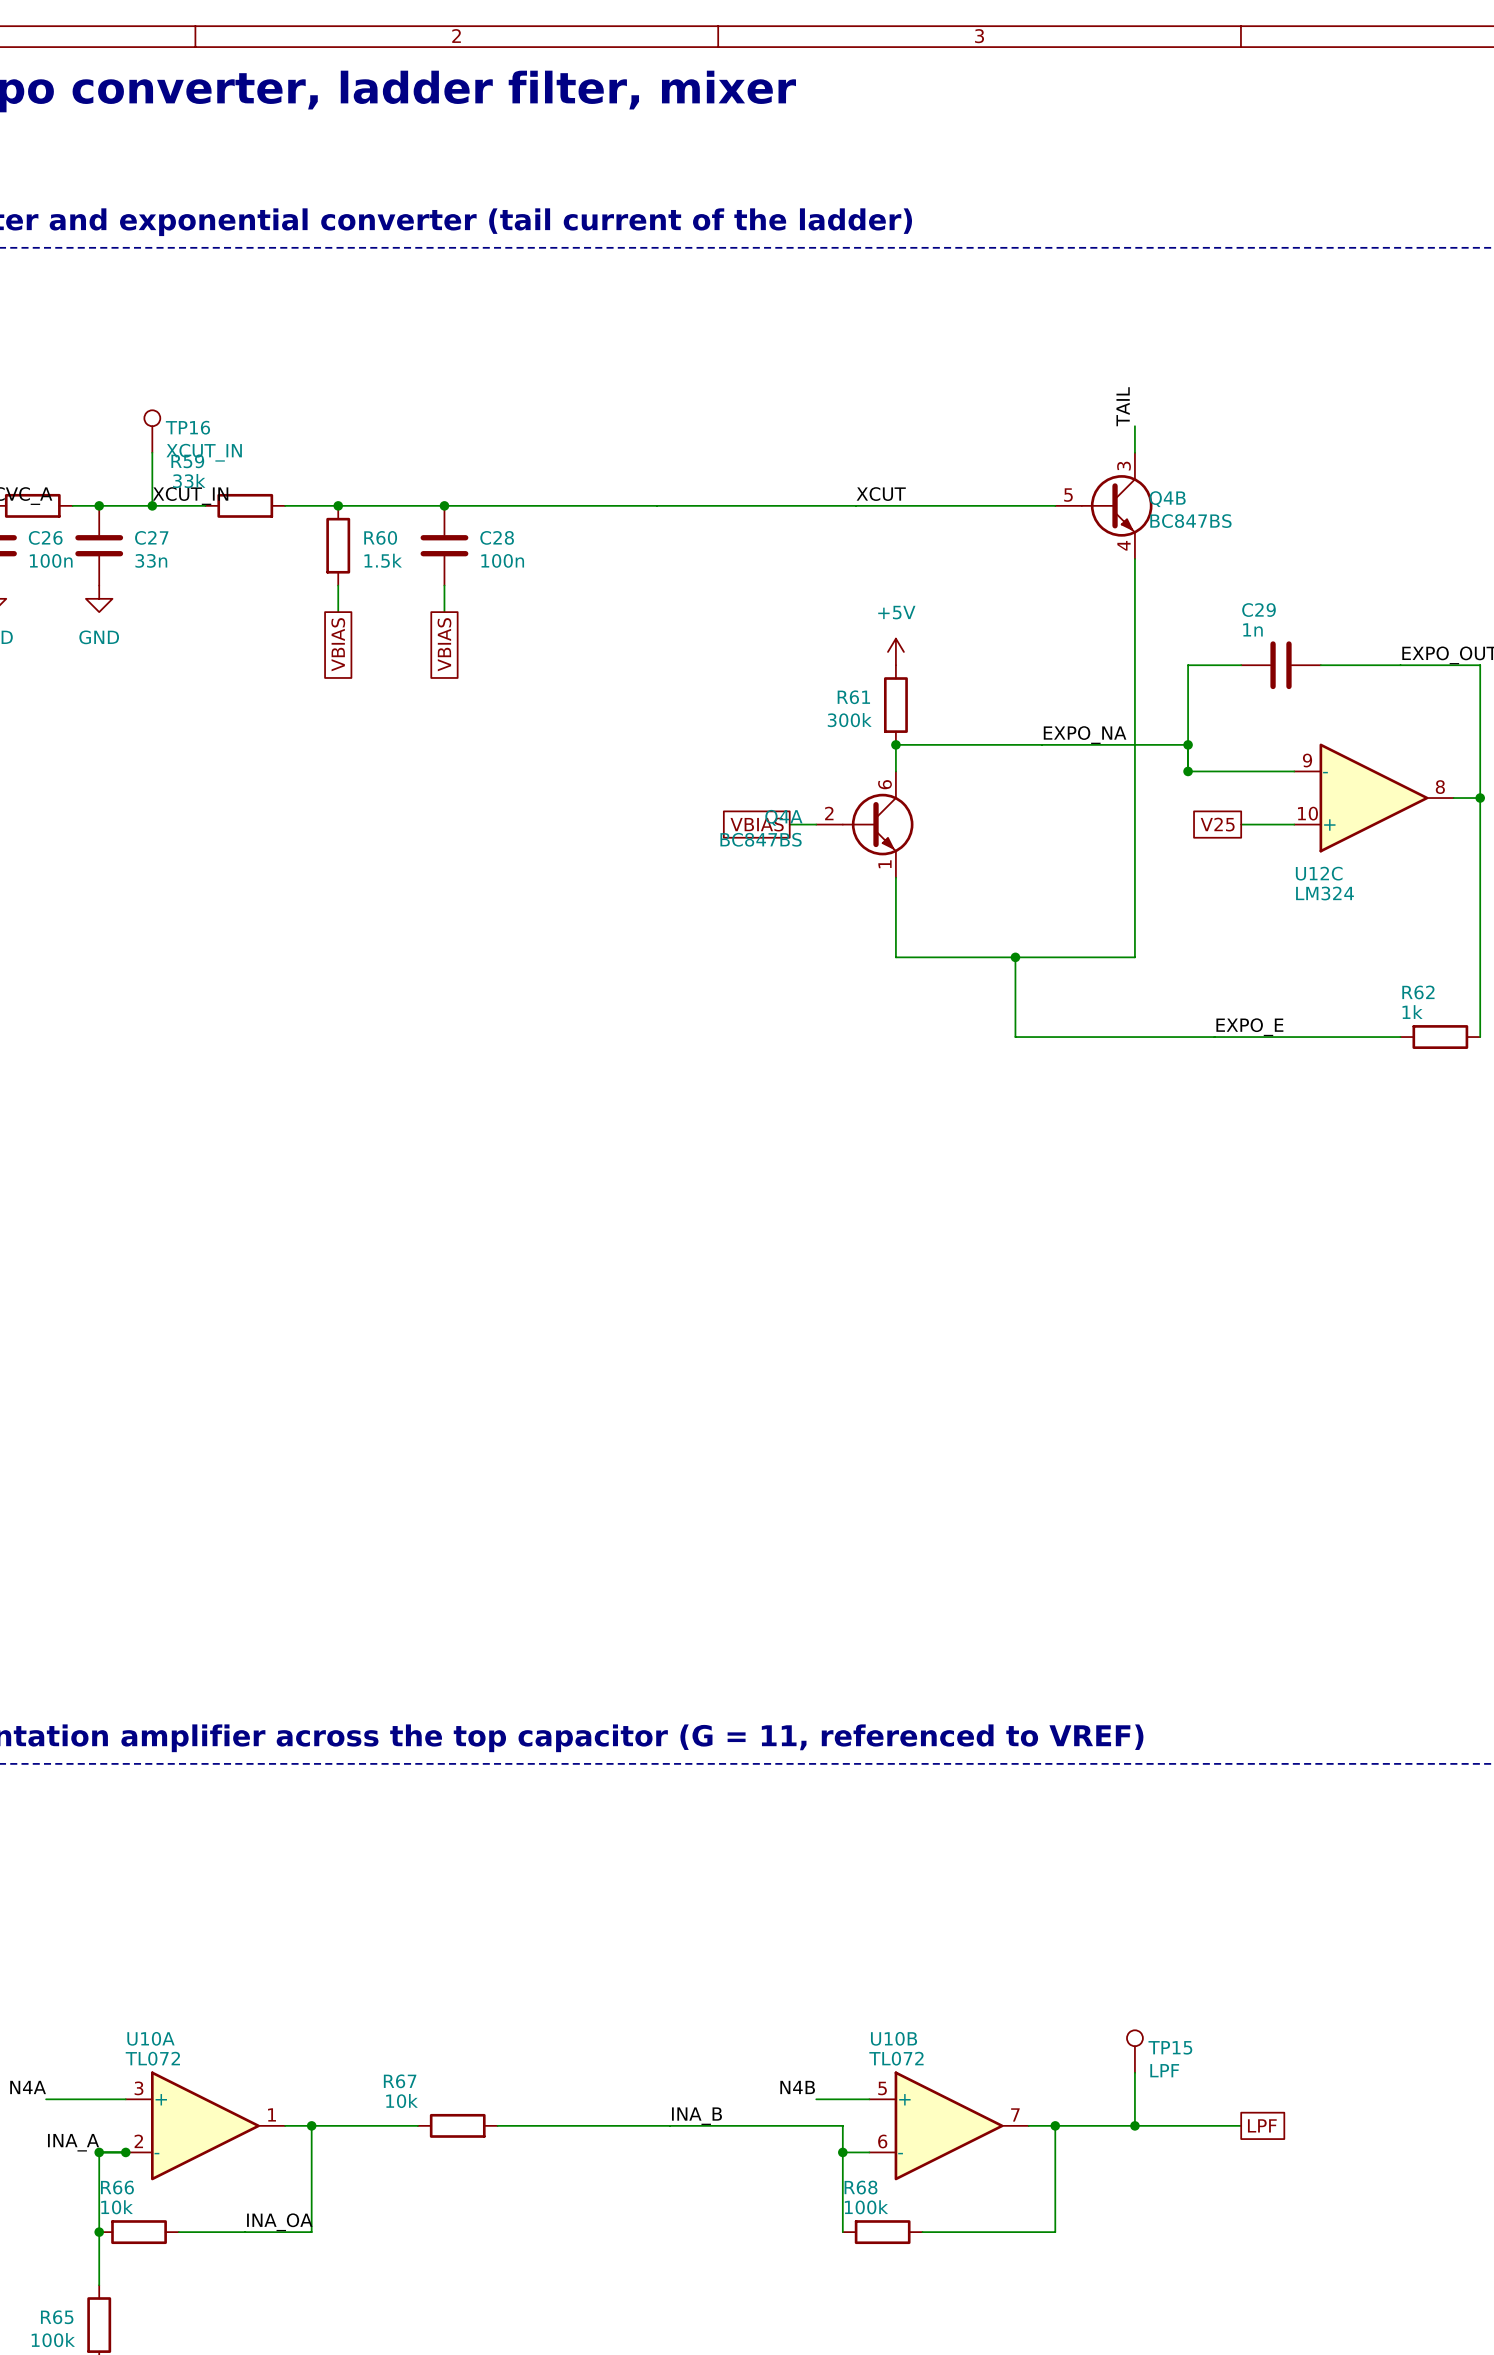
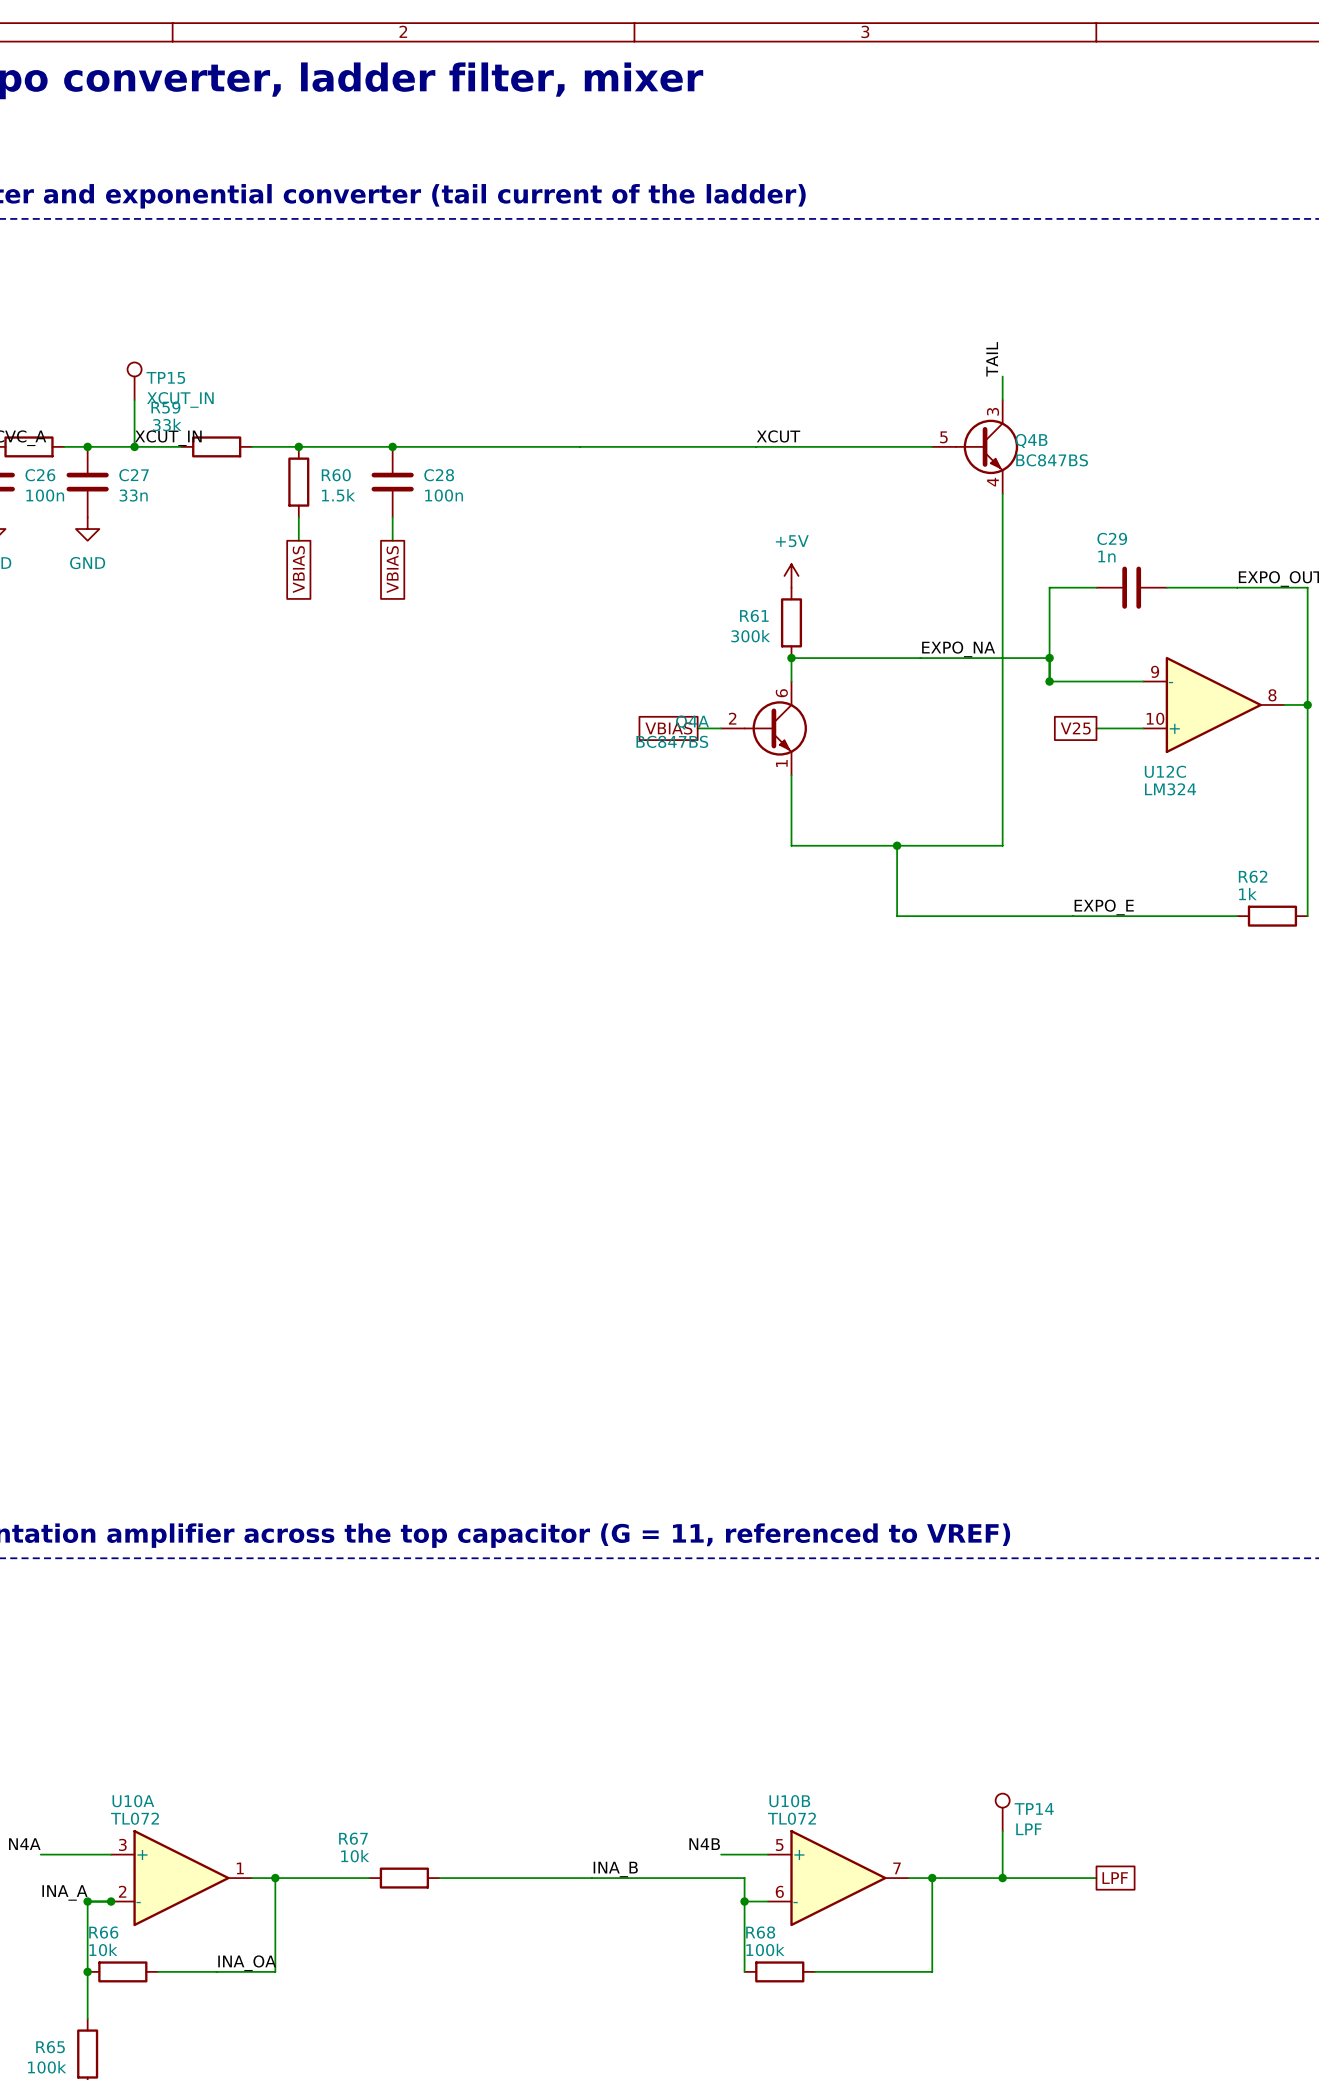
TP16 name: TP16 (187, 427) -> TP15 (165, 377)
TP15 name: TP15 (1170, 2047) -> TP14 (1034, 1808)

